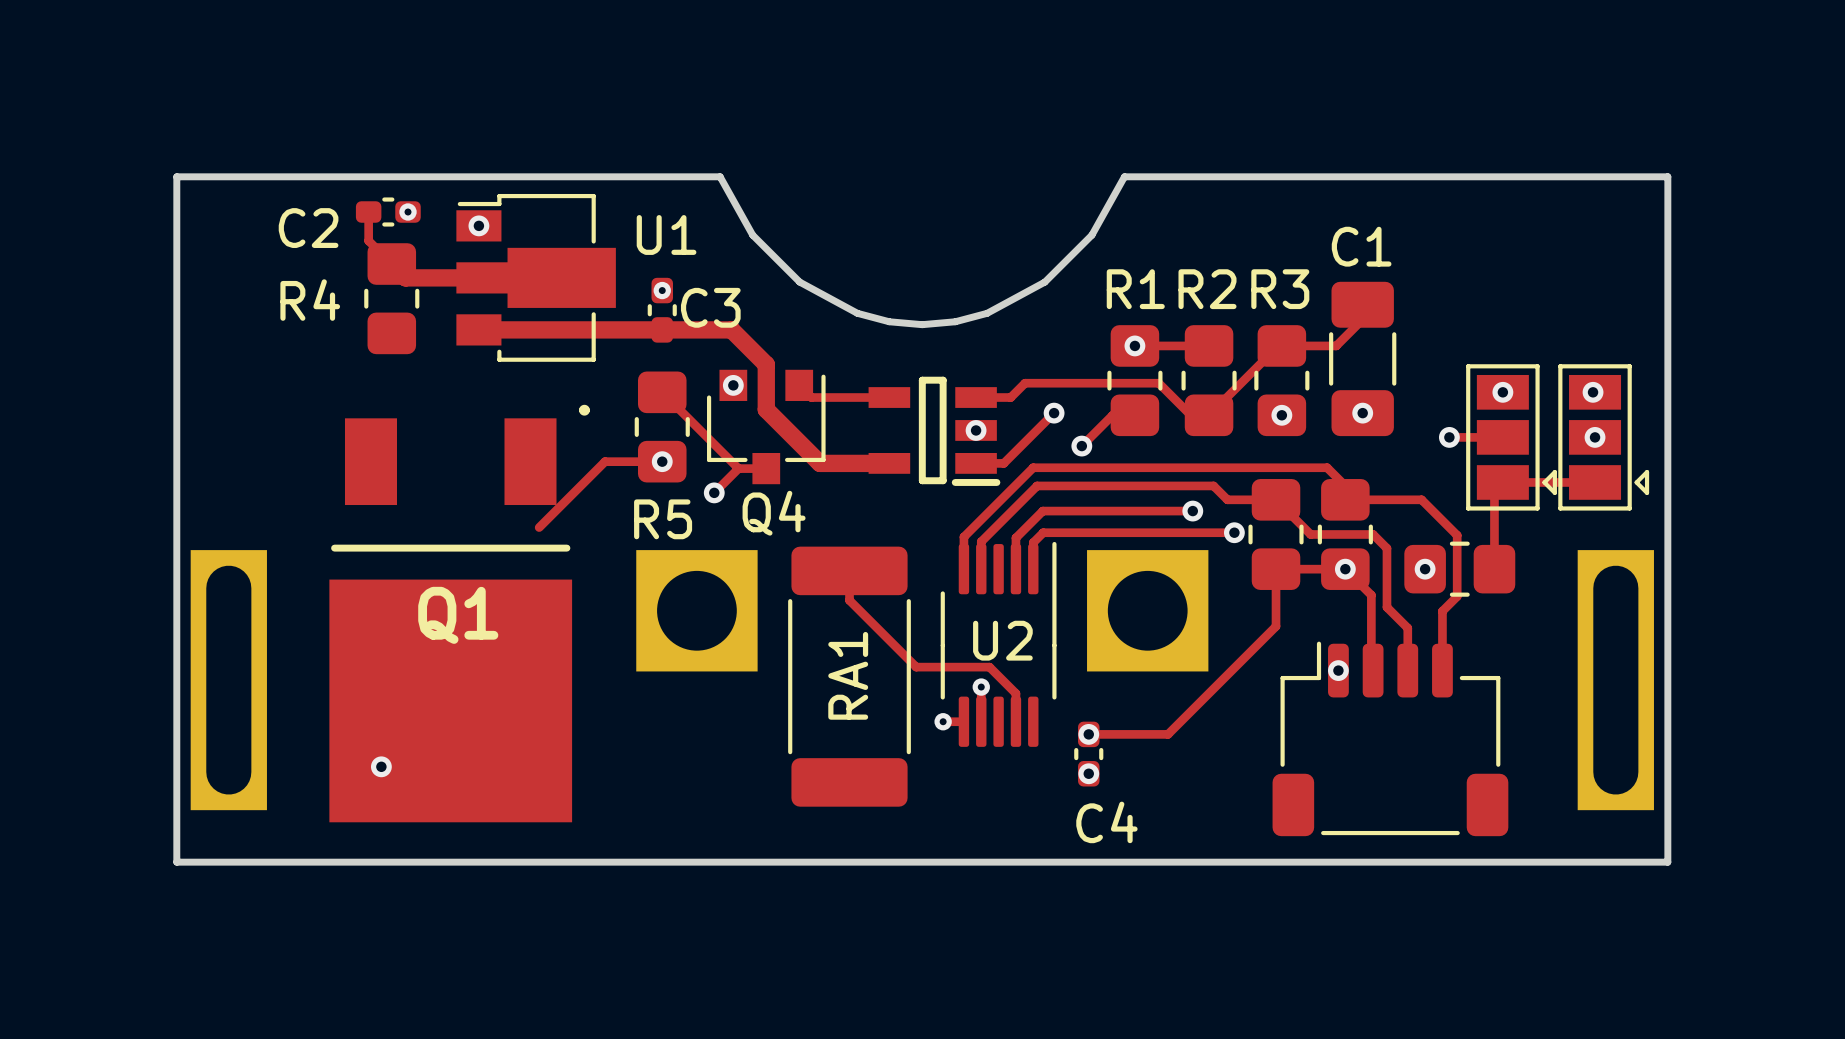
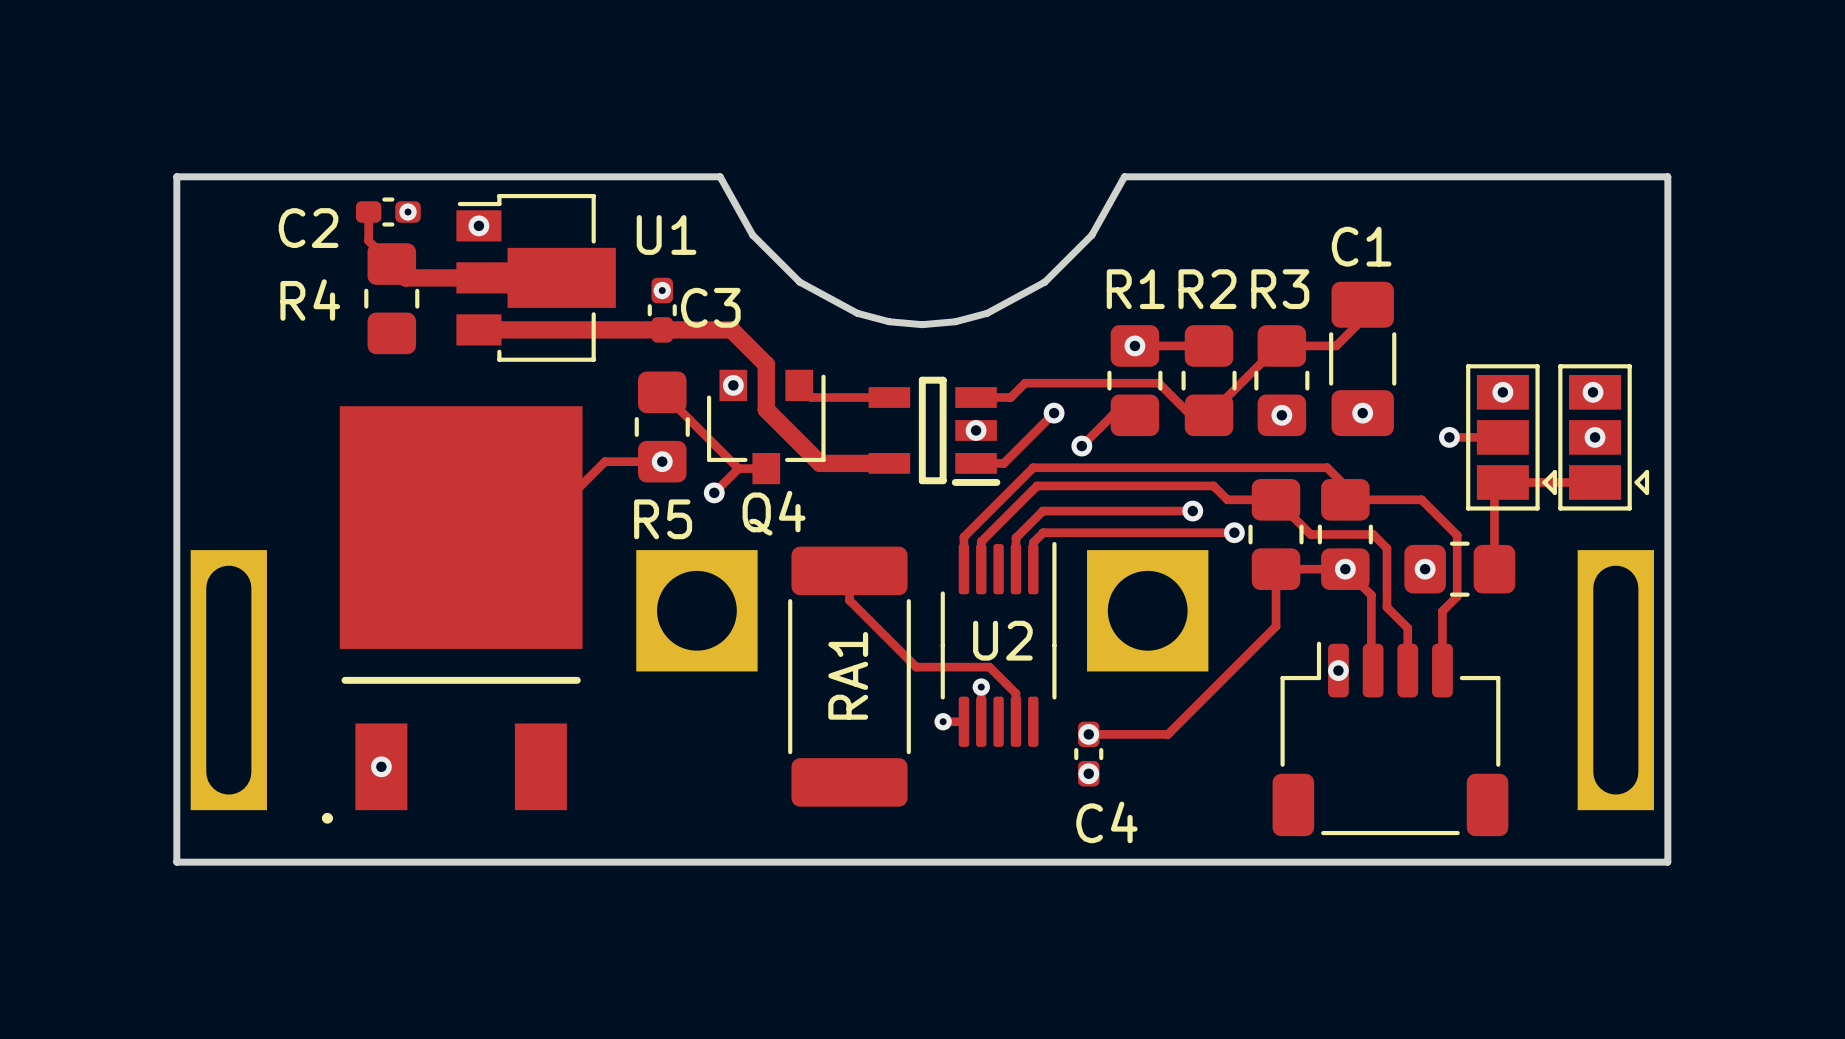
Q1: (459, 613) -> none
part: none -> (452, 614)

